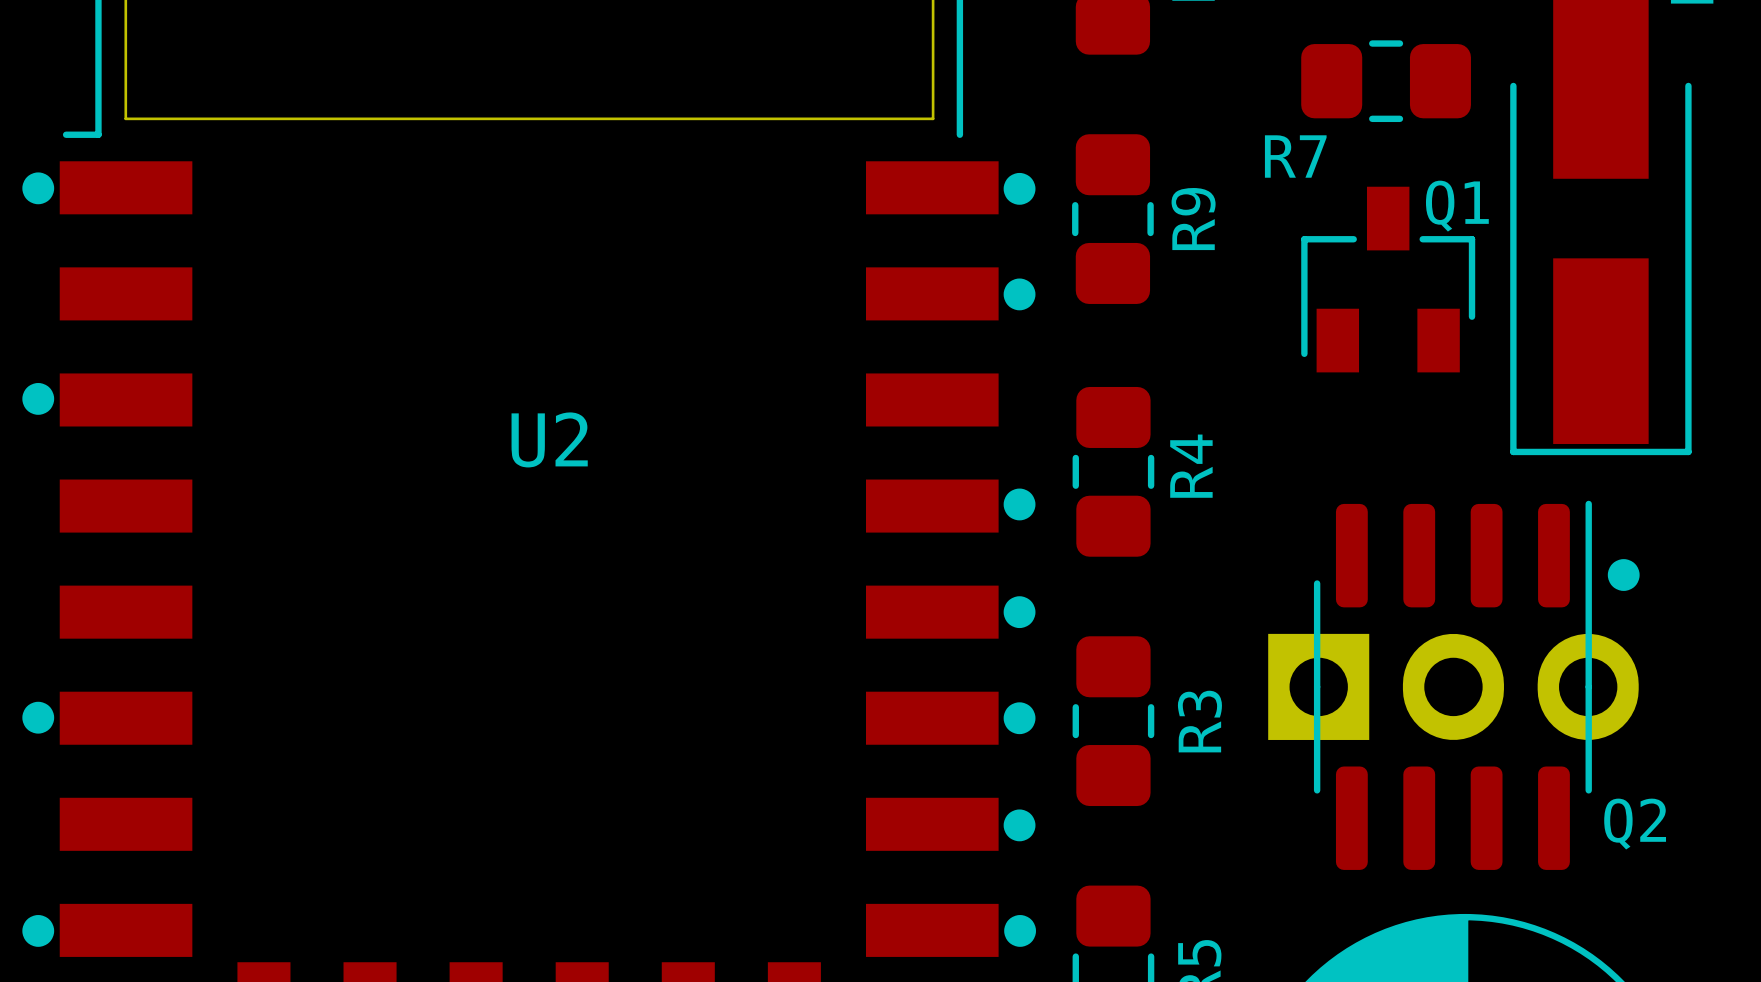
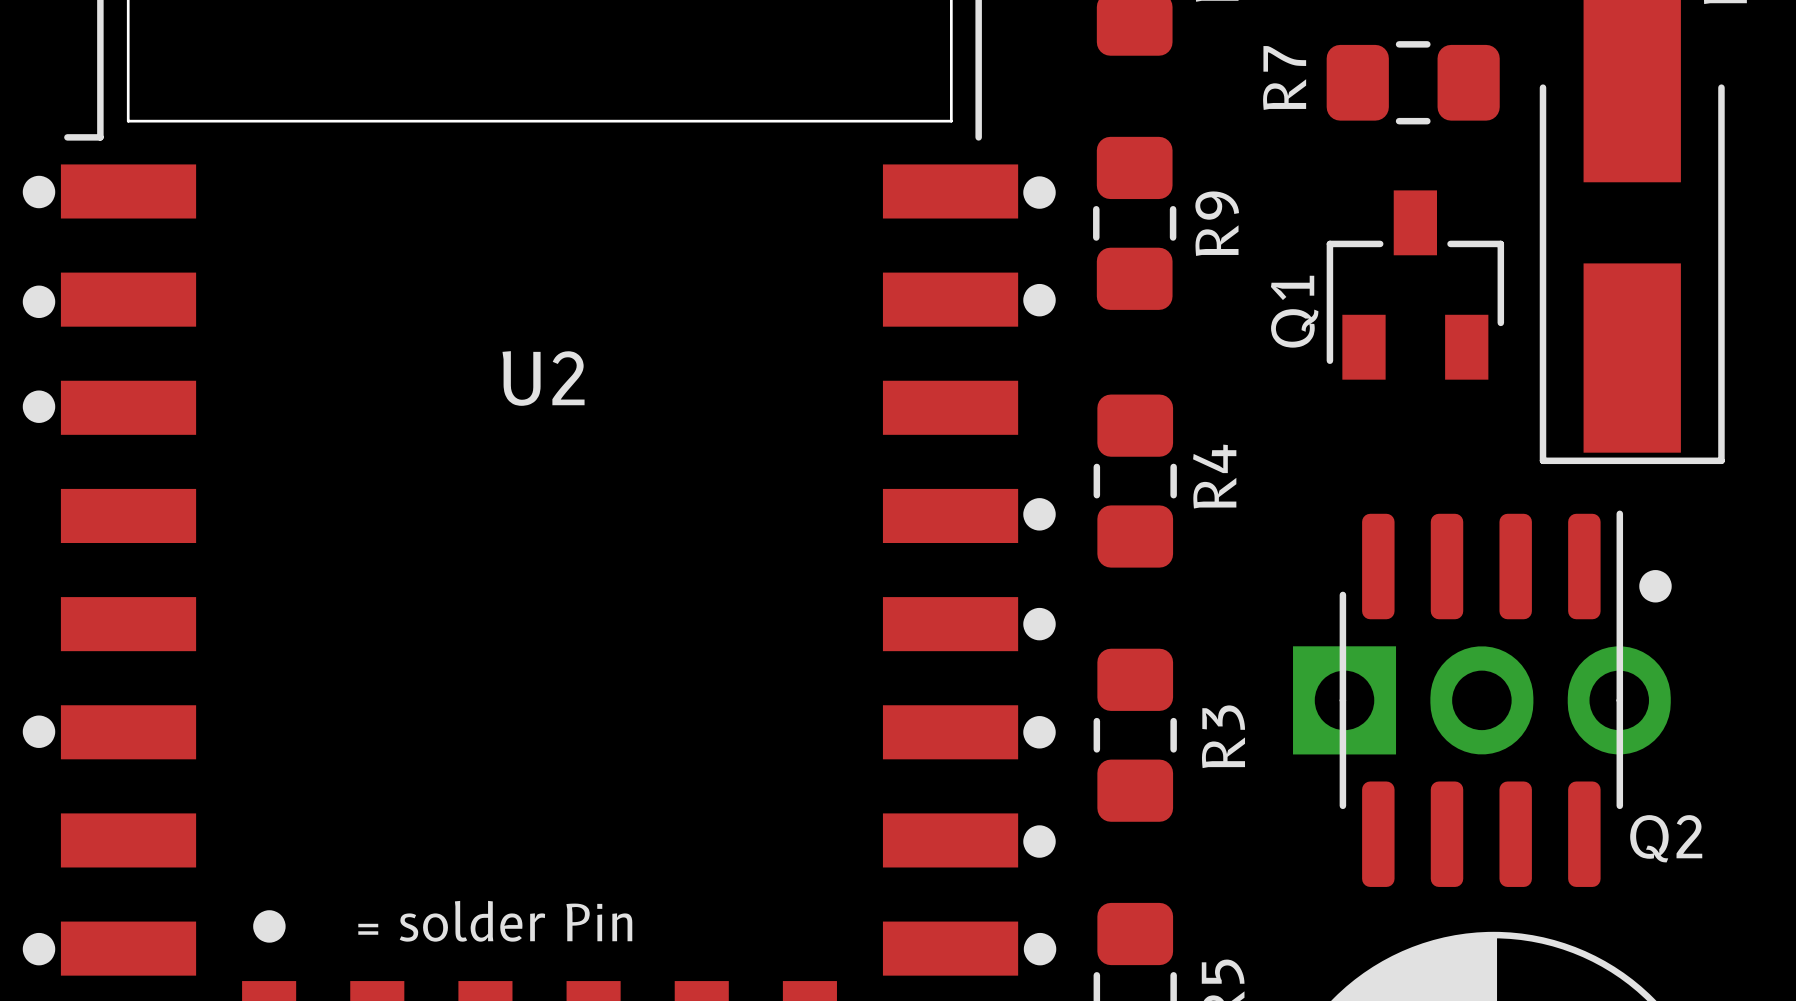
R7 name rotation: 0° (1295, 156) -> 90° counterclockwise (1284, 78)
Q1 name rotation: 0° (1457, 206) -> 90° counterclockwise (1294, 311)
Q1 name position: Q1 (1457, 206) -> Q1 (1294, 311)
drawing: none -> [22, 285, 56, 319]
U2 name position: U2 (549, 439) -> U2 (543, 378)
drawing: none -> [253, 910, 286, 943]
text: none -> = solder Pin (495, 921)

